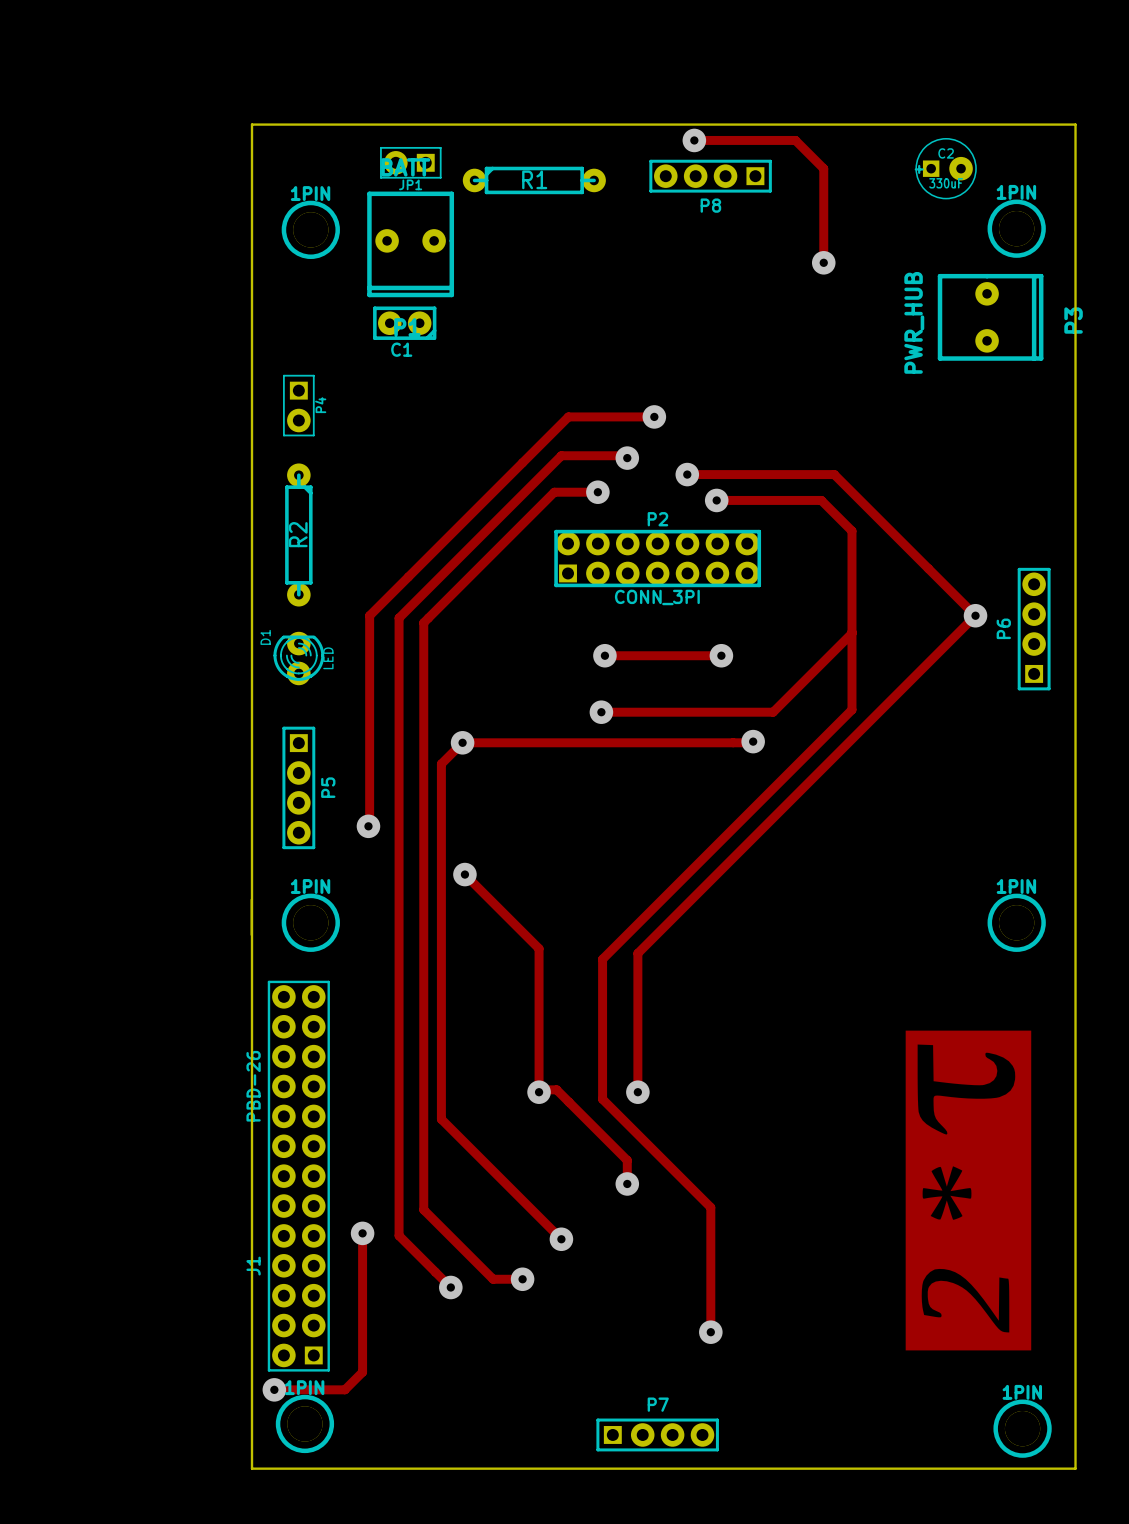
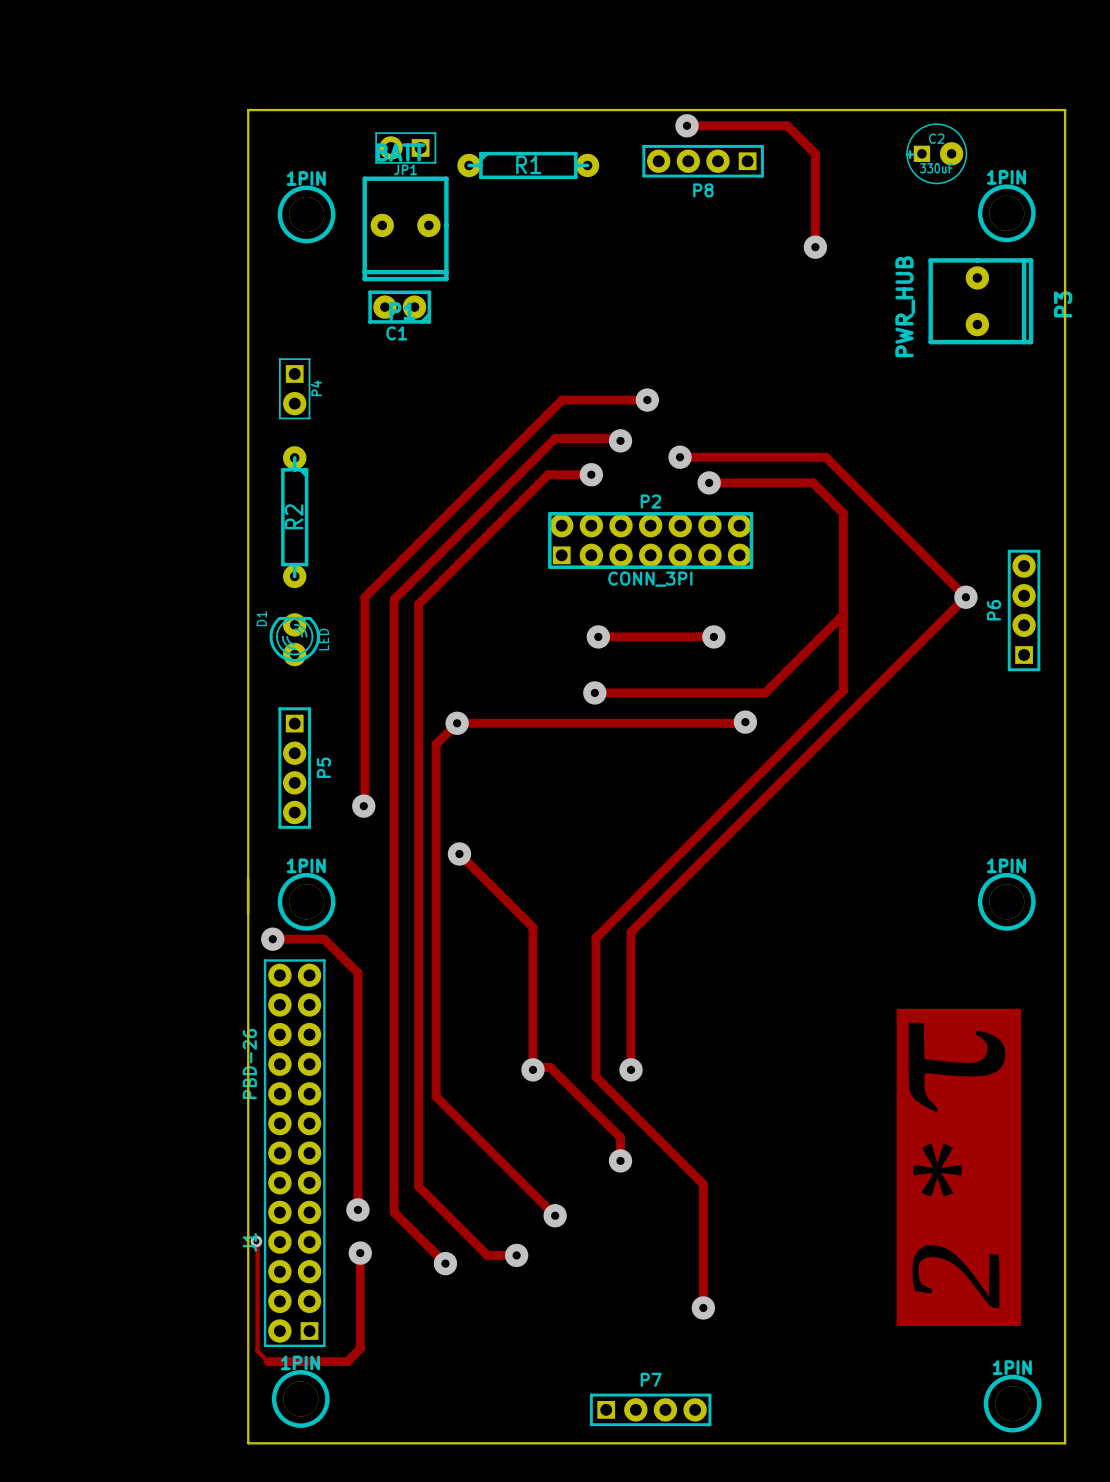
via: none -> (272, 939)
track: (362, 1233) (362, 1372) (344, 1389) (274, 1389) -> (357, 1209) (357, 973) (324, 939) (272, 939)
track: none -> (256, 1241) (257, 1351) (268, 1361) (347, 1361) (360, 1348) (360, 1253)
via: none -> (256, 1241)
via: none -> (360, 1253)
via: (274, 1389) -> none

